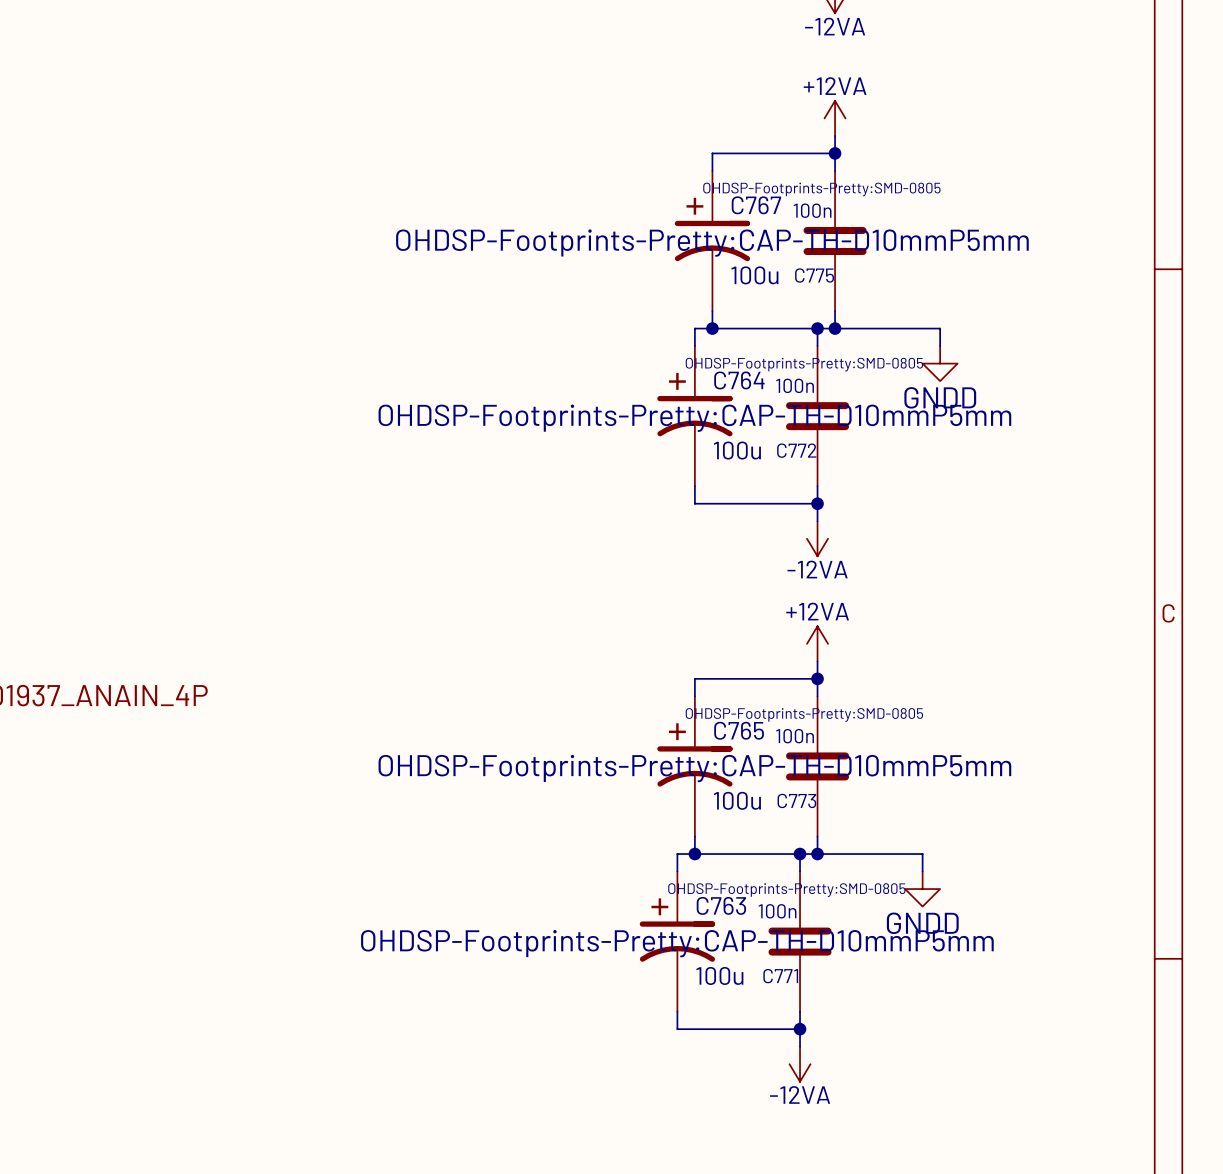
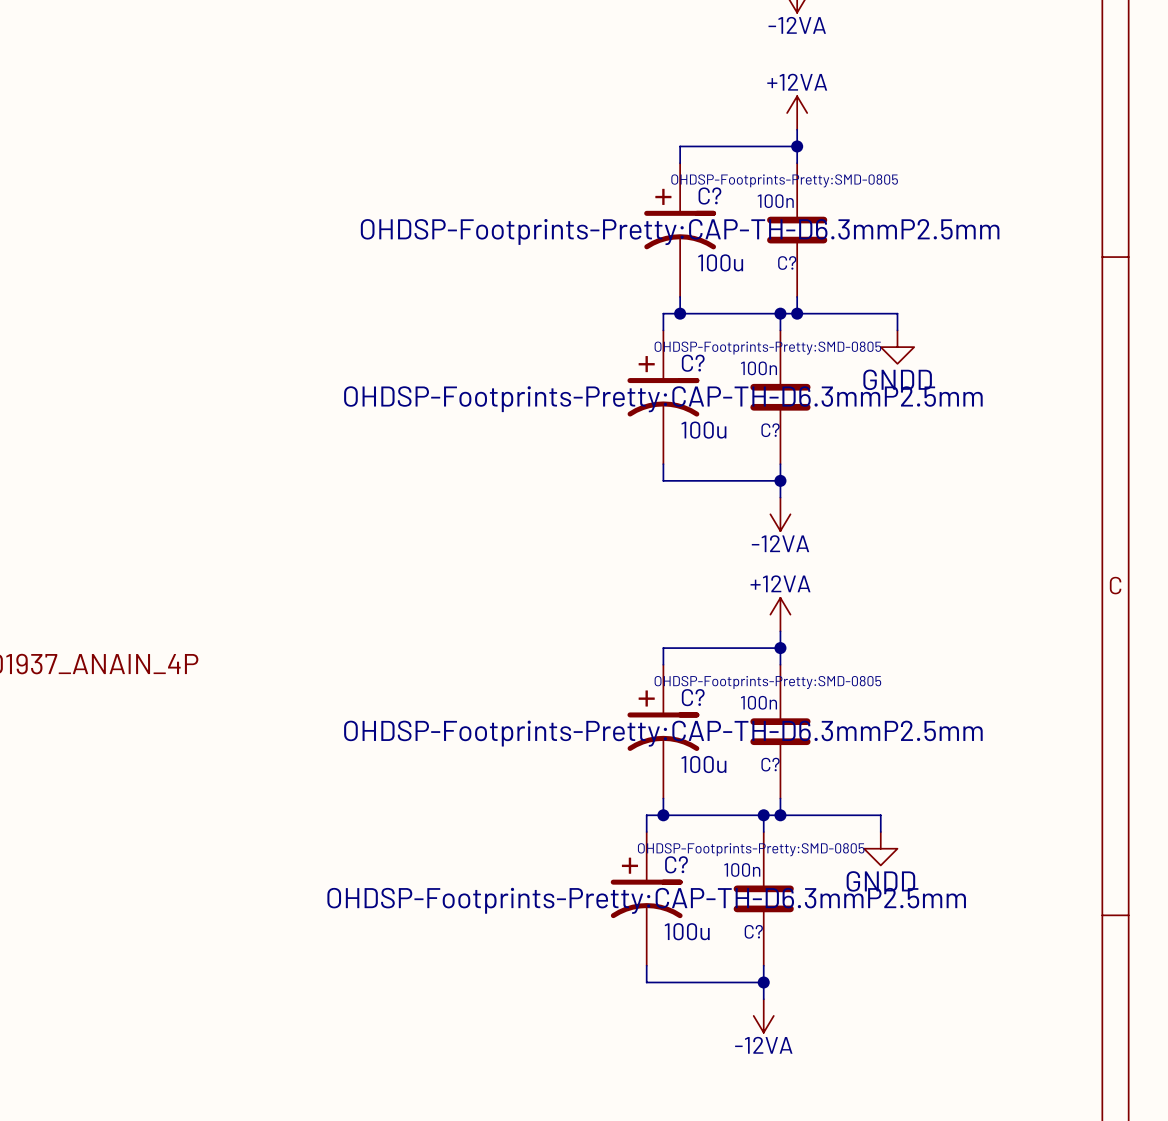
C767 name: C767 (756, 205) -> C? (709, 196)
C767 text: OHDSP-Footprints-Pretty:CAP-TH-D10mmP5mm (712, 243) -> OHDSP-Footprints-Pretty:CAP-TH-D6.3mmP2.5mm (680, 232)
C775 name: C775 (814, 275) -> C? (787, 263)
C764 name: C764 (739, 380) -> C? (693, 363)
C764 text: OHDSP-Footprints-Pretty:CAP-TH-D10mmP5mm (694, 418) -> OHDSP-Footprints-Pretty:CAP-TH-D6.3mmP2.5mm (663, 399)
C772 name: C772 (796, 450) -> C? (770, 430)
C765 name: C765 (739, 730) -> C? (693, 697)
C765 text: OHDSP-Footprints-Pretty:CAP-TH-D10mmP5mm (694, 768) -> OHDSP-Footprints-Pretty:CAP-TH-D6.3mmP2.5mm (663, 733)
C773 name: C773 (796, 800) -> C? (770, 764)
C763 name: C763 (721, 905) -> C? (676, 864)
C763 text: OHDSP-Footprints-Pretty:CAP-TH-D10mmP5mm (677, 943) -> OHDSP-Footprints-Pretty:CAP-TH-D6.3mmP2.5mm (646, 900)
C771 name: C771 (780, 976) -> C? (753, 931)

